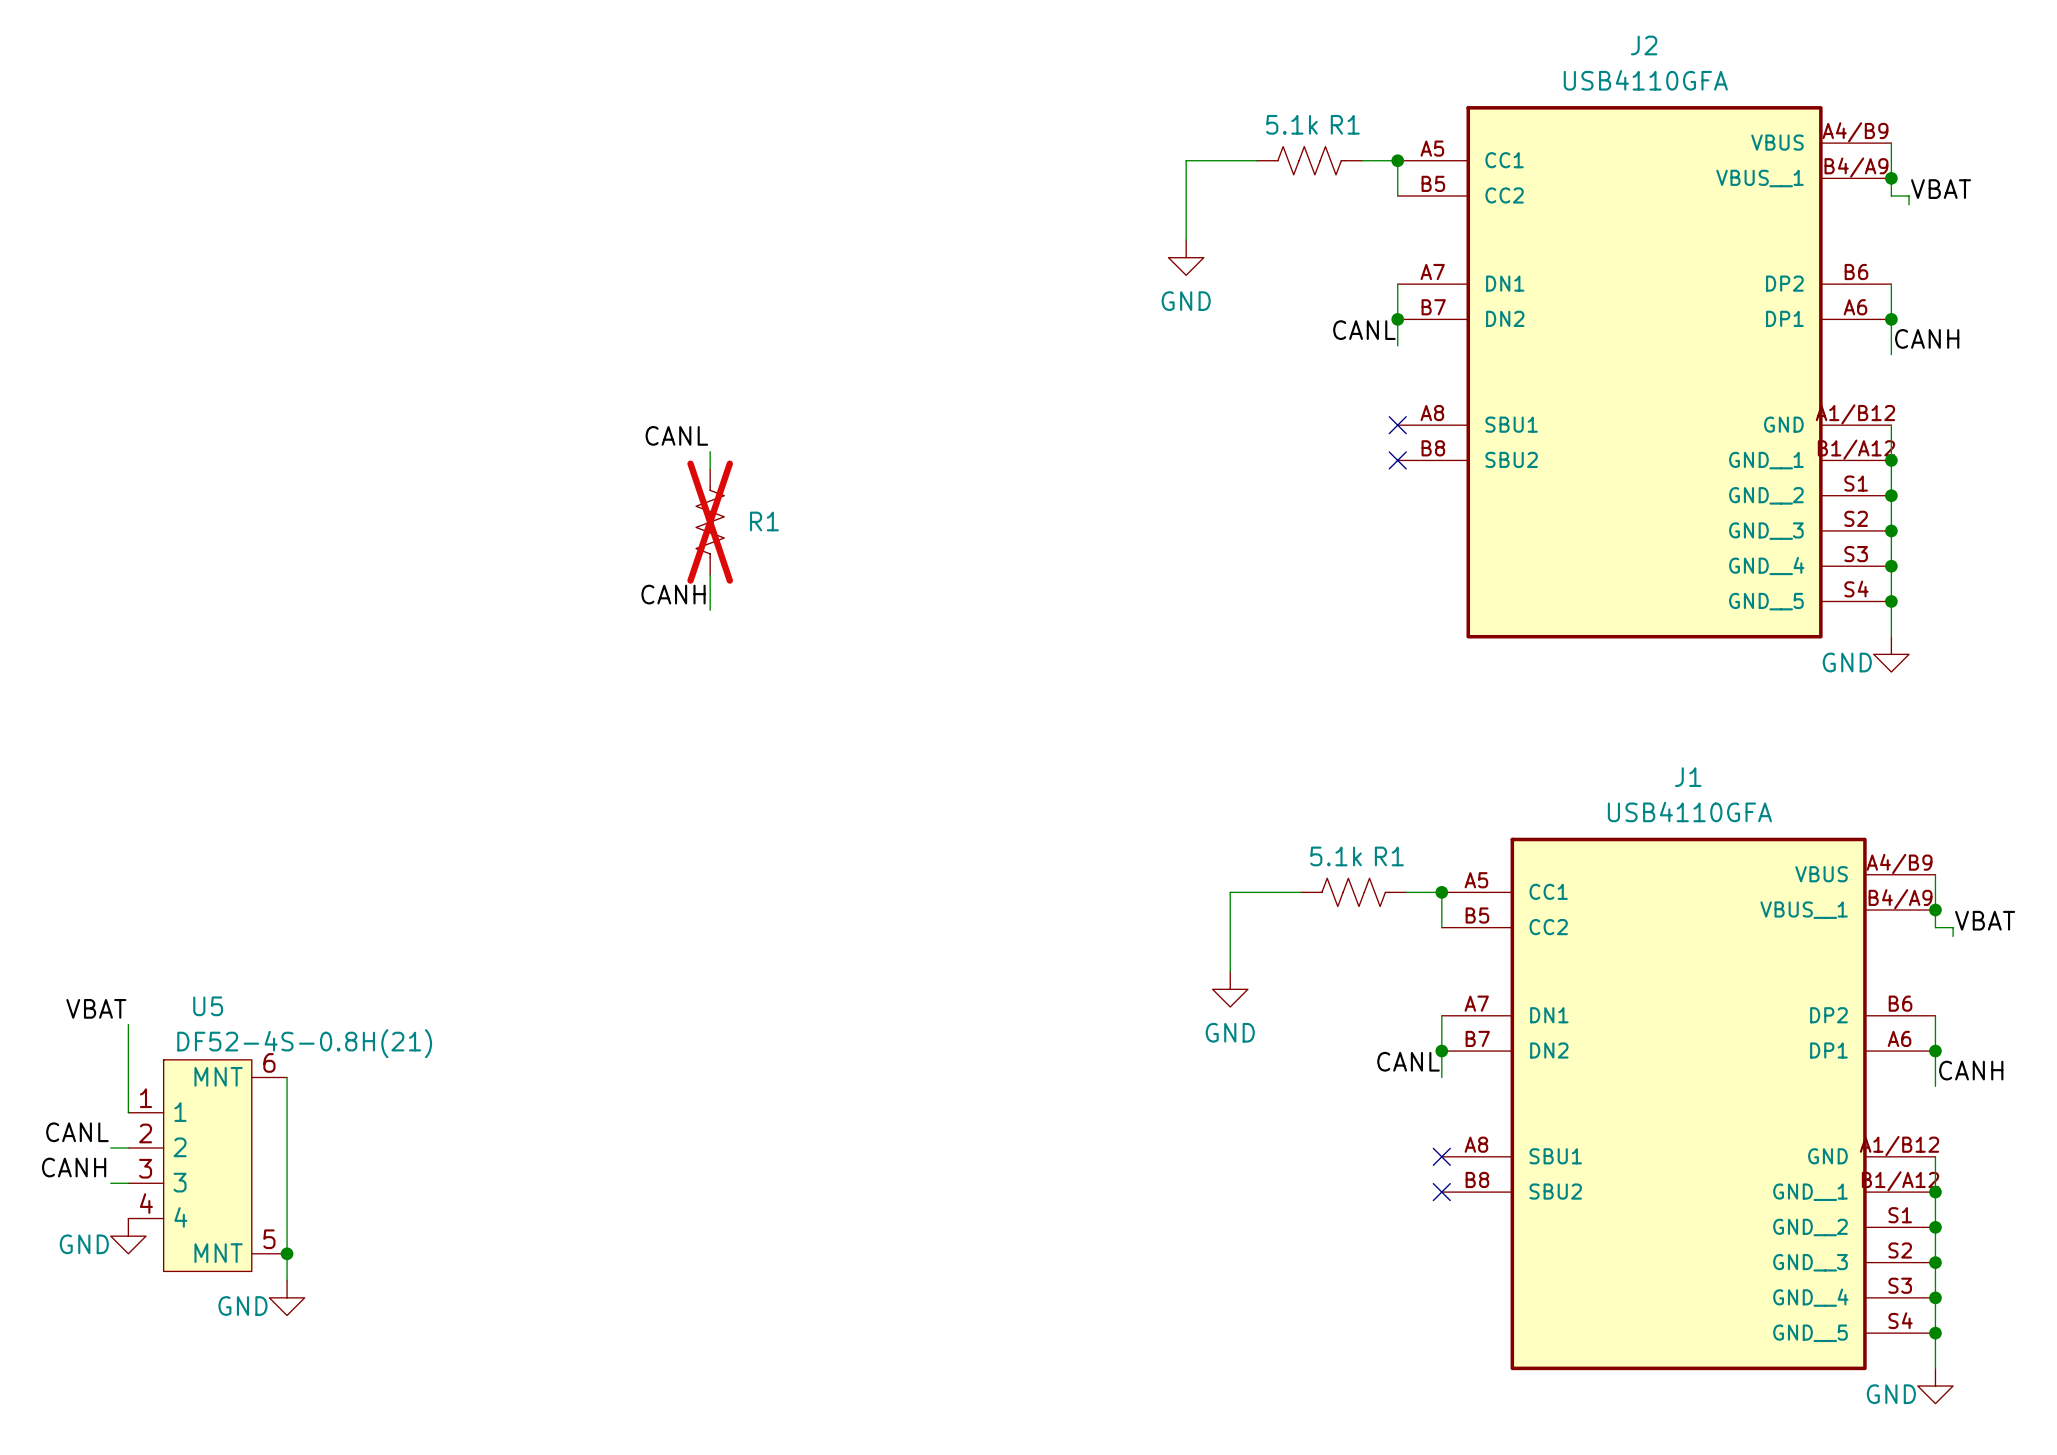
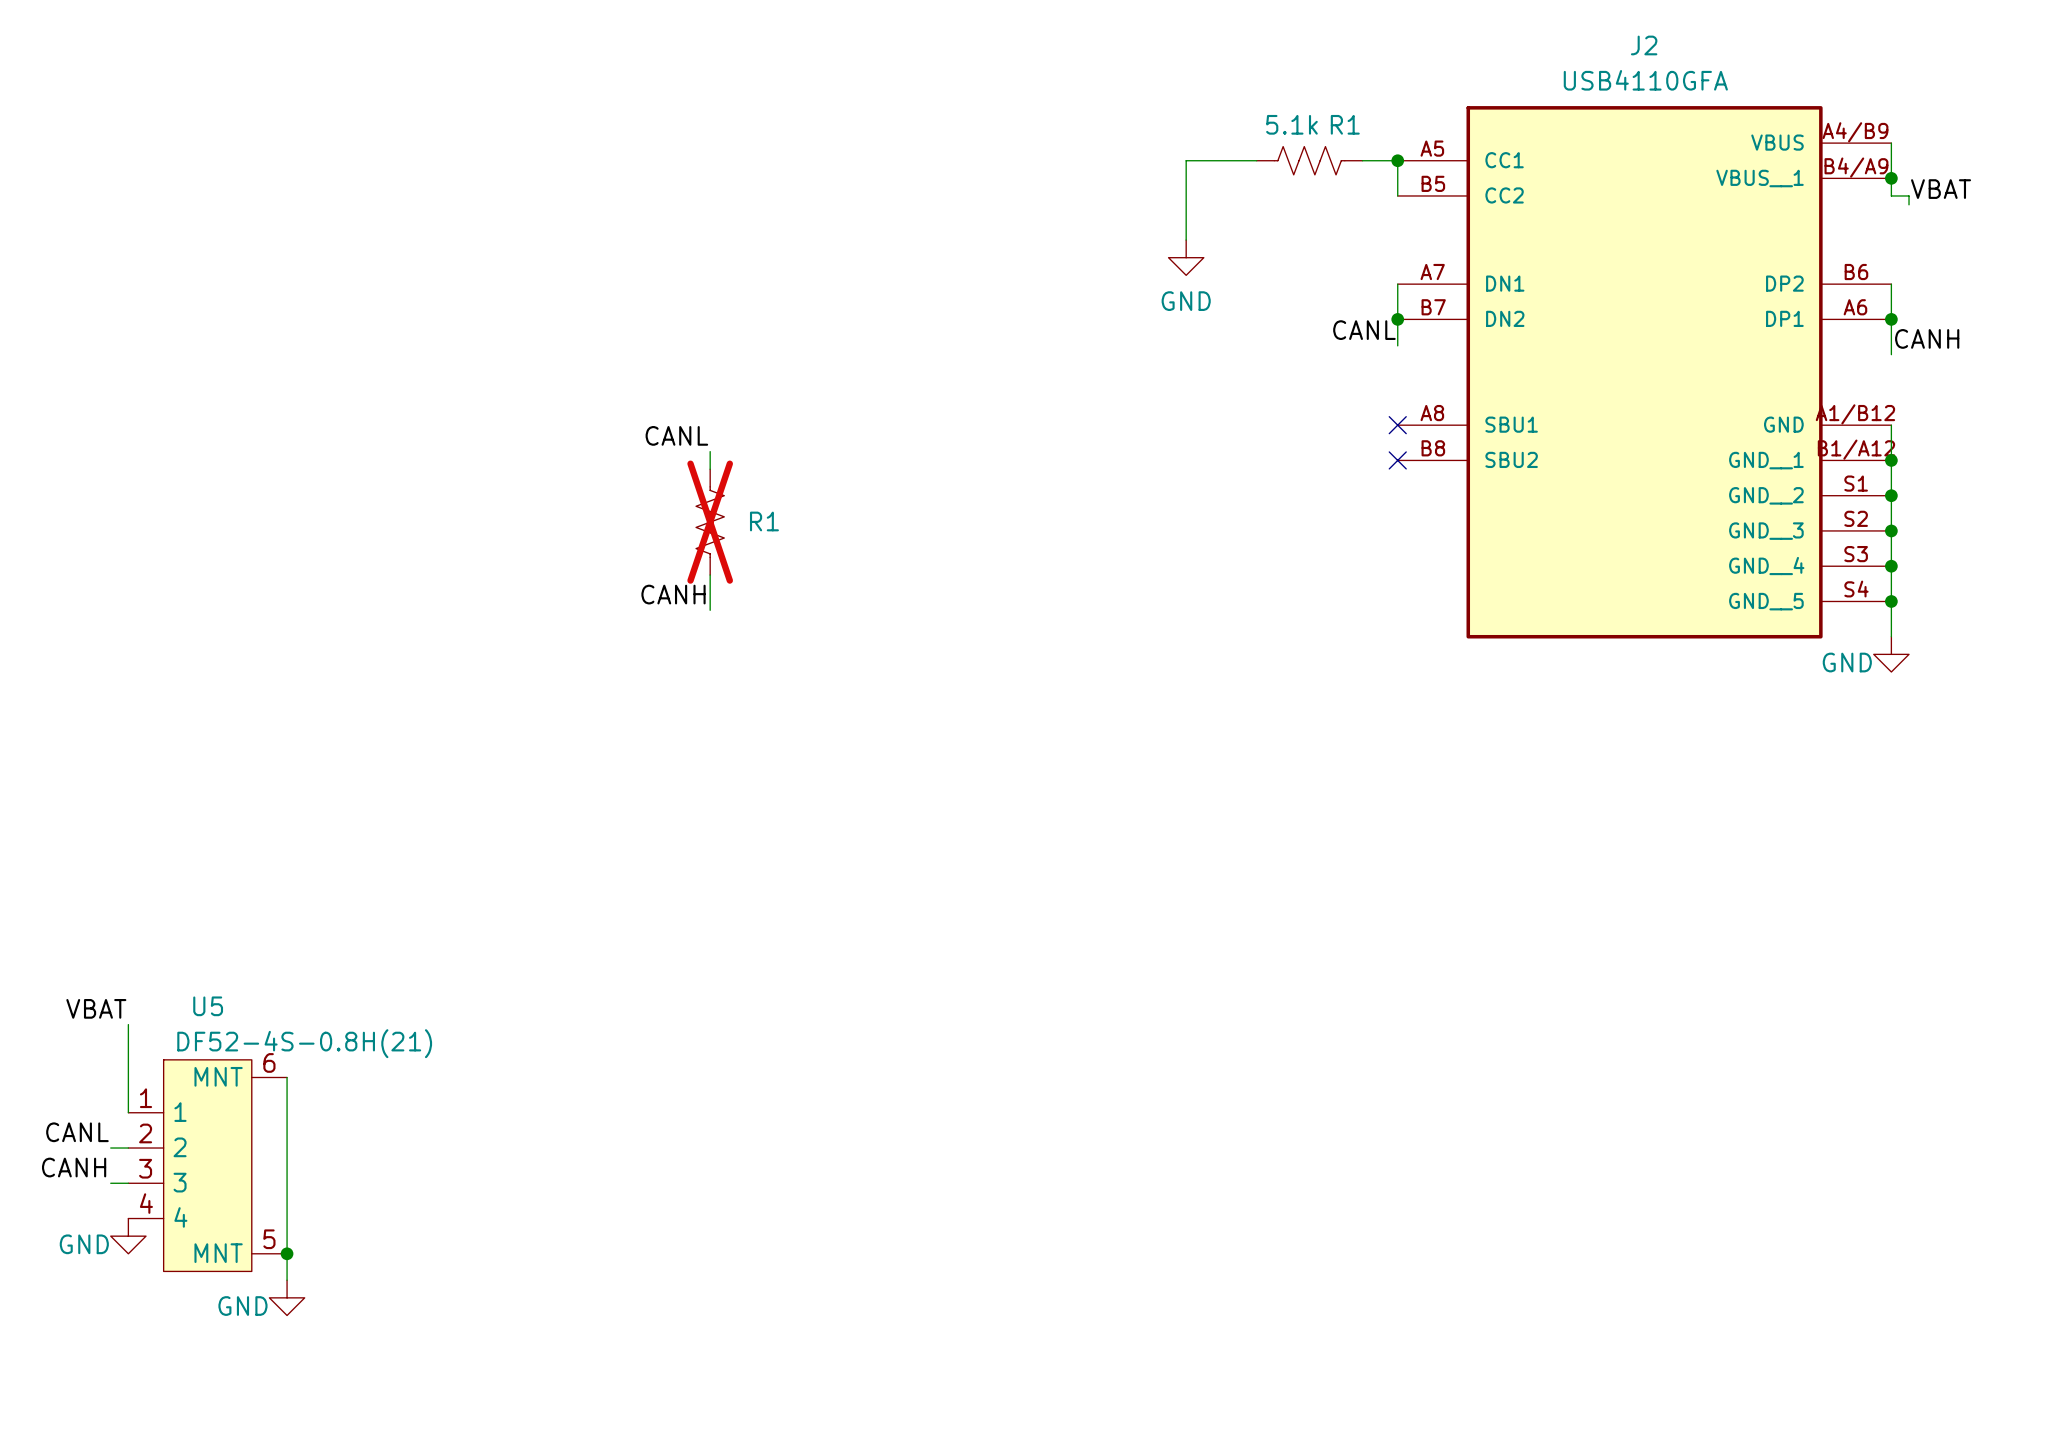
wire: (1935, 874) (1935, 927) (1953, 927) (1953, 936) -> none
wire: (1300, 892) (1230, 892) (1230, 971) -> none
R1: 5.1k (1353, 892) -> none
wire: (1406, 892) (1441, 892) (1441, 927) -> none
junction: (1441, 892) -> none
junction: (1935, 910) -> none
label: VBAT (1985, 920) -> none
power symbol: GND (1230, 989) -> none
wire: (1441, 1015) (1441, 1077) -> none
wire: (1935, 1015) (1935, 1086) -> none
junction: (1441, 1051) -> none
junction: (1935, 1051) -> none
label: CANL (1408, 1061) -> none
label: CANH (1971, 1070) -> none
J1: USB4110GFA (1688, 1103) -> none
no-connect mark: (1441, 1156) -> none
wire: (1935, 1156) (1935, 1368) -> none
no-connect mark: (1441, 1192) -> none
junction: (1935, 1192) -> none
junction: (1935, 1227) -> none
junction: (1935, 1262) -> none
junction: (1935, 1297) -> none
junction: (1935, 1333) -> none
power symbol: GND (1935, 1386) -> none

